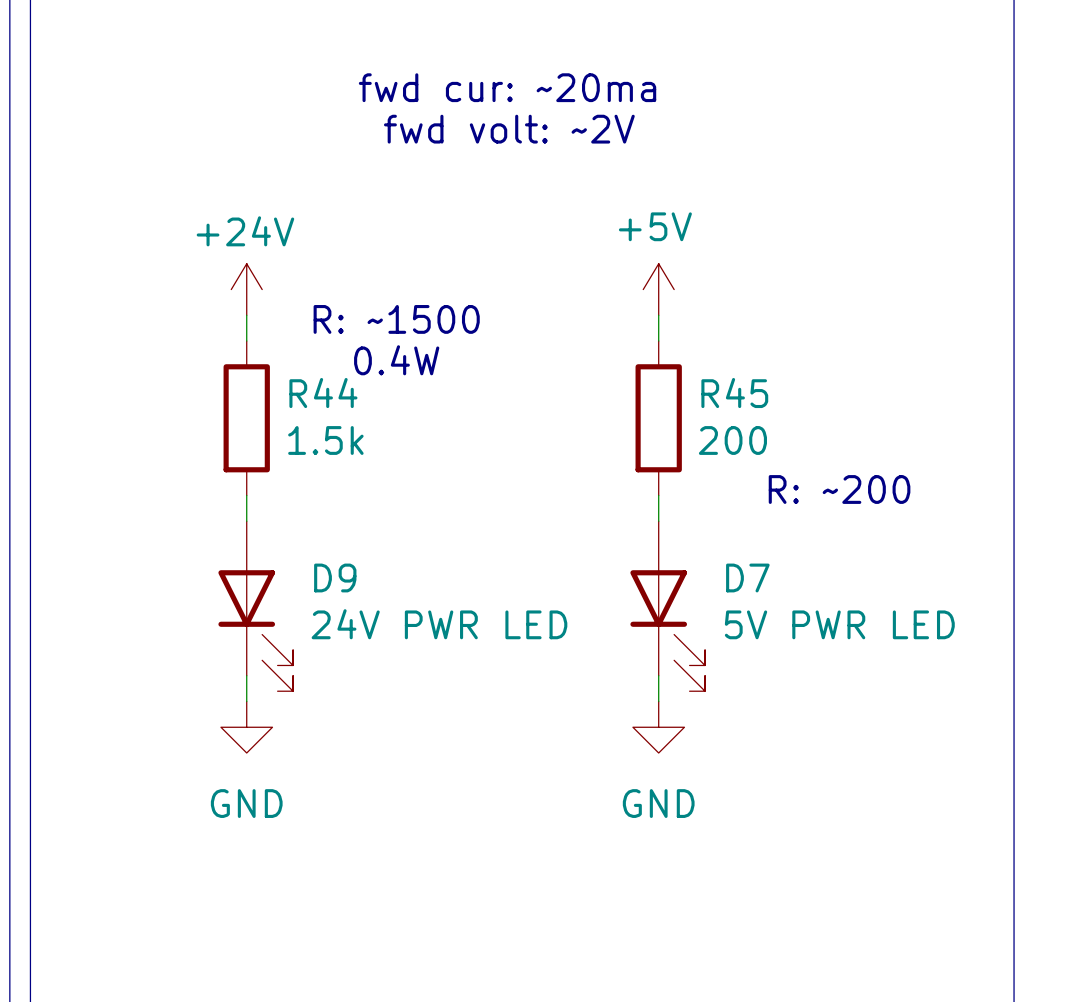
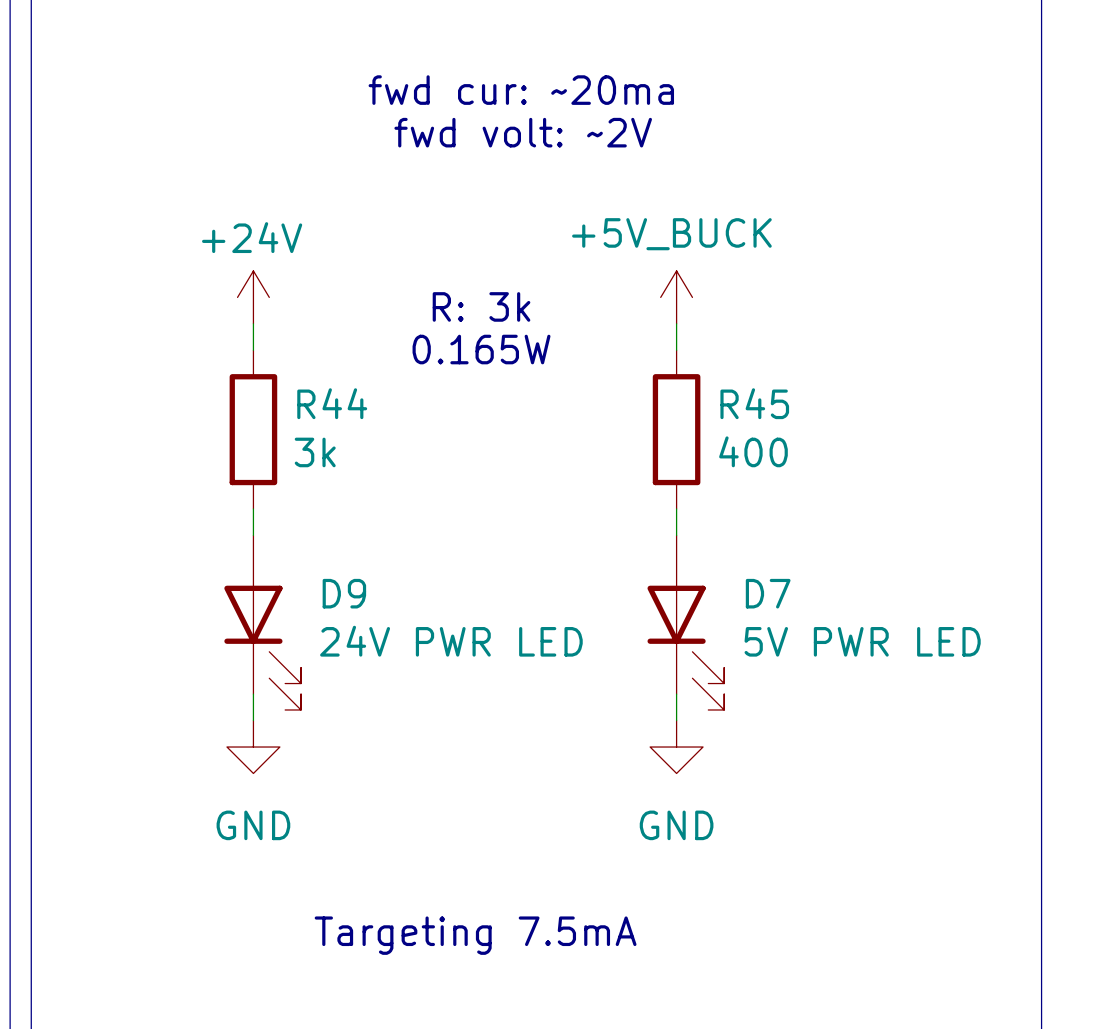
power symbol: +5V (658, 289) -> +5V_BUCK (676, 297)
text: none -> R: 3k (481, 306)
text: R: ~1500 (396, 319) -> none
text: none -> 0.165W (481, 349)
text: 0.4W (396, 360) -> none
R44 value: 1.5k (325, 440) -> 3k (315, 452)
R45 value: 200 (732, 440) -> 400 (753, 451)
text: R: ~200 (839, 489) -> none
text: none -> Targeting 7.5mA (475, 935)

